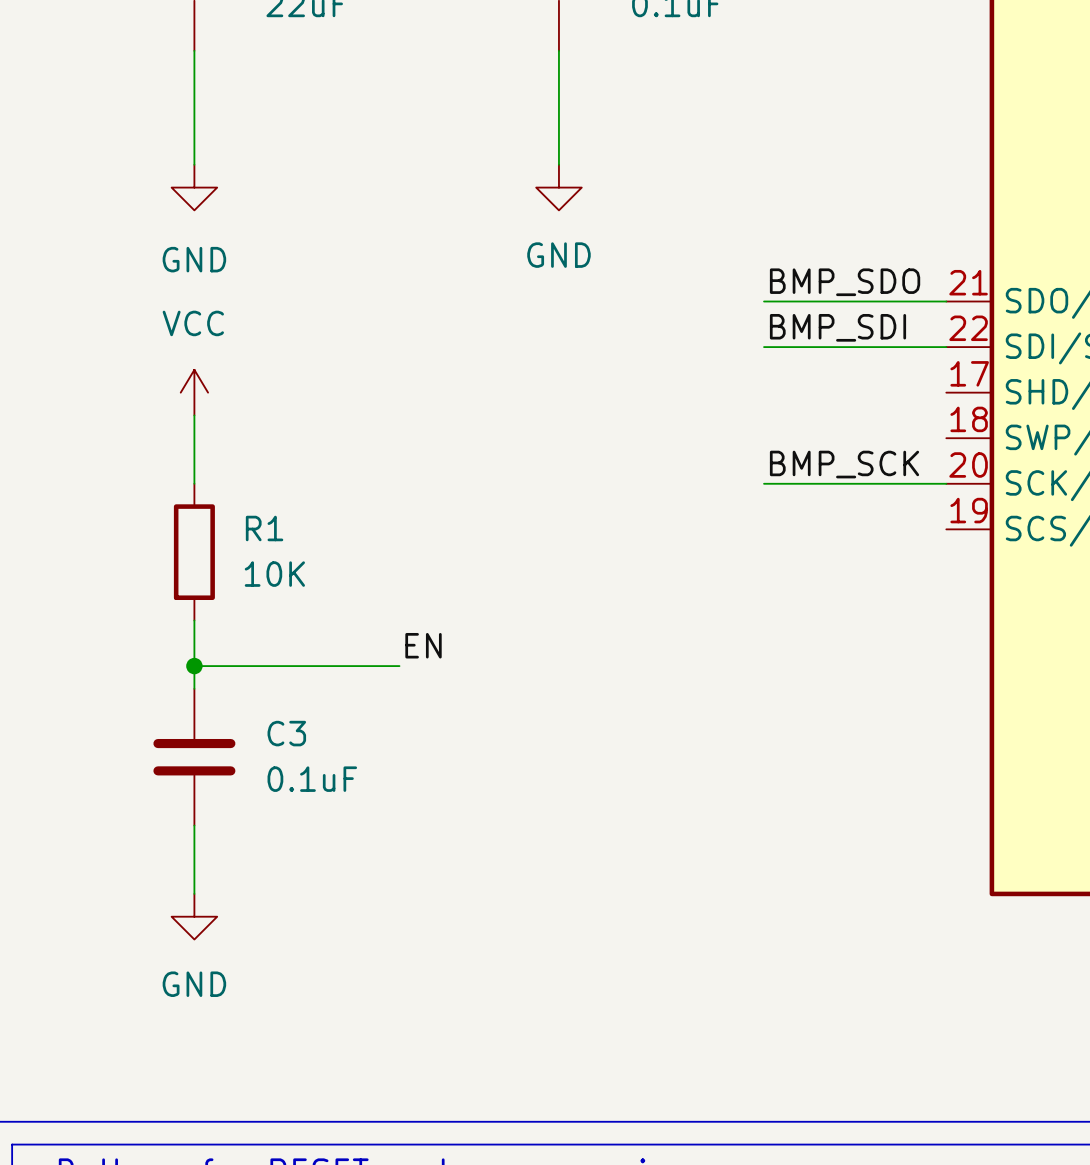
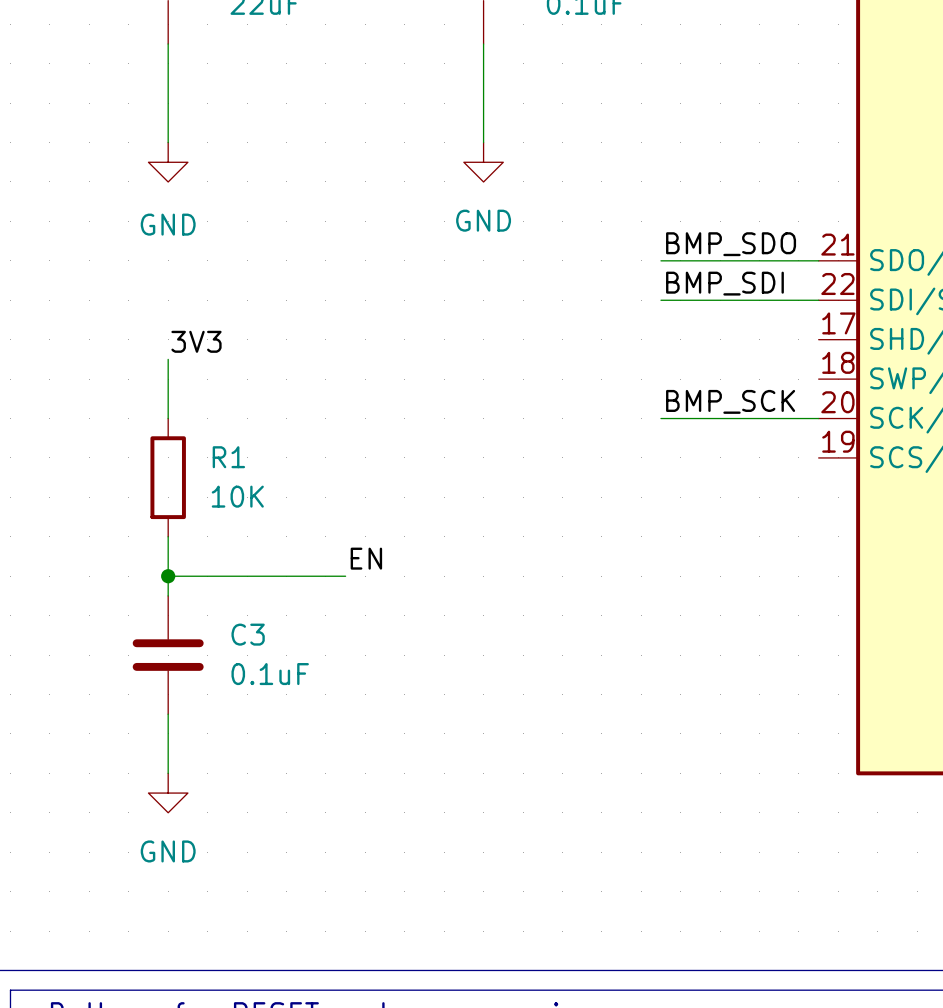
power symbol: VCC (194, 392) -> none
label: none -> 3V3 (196, 341)

